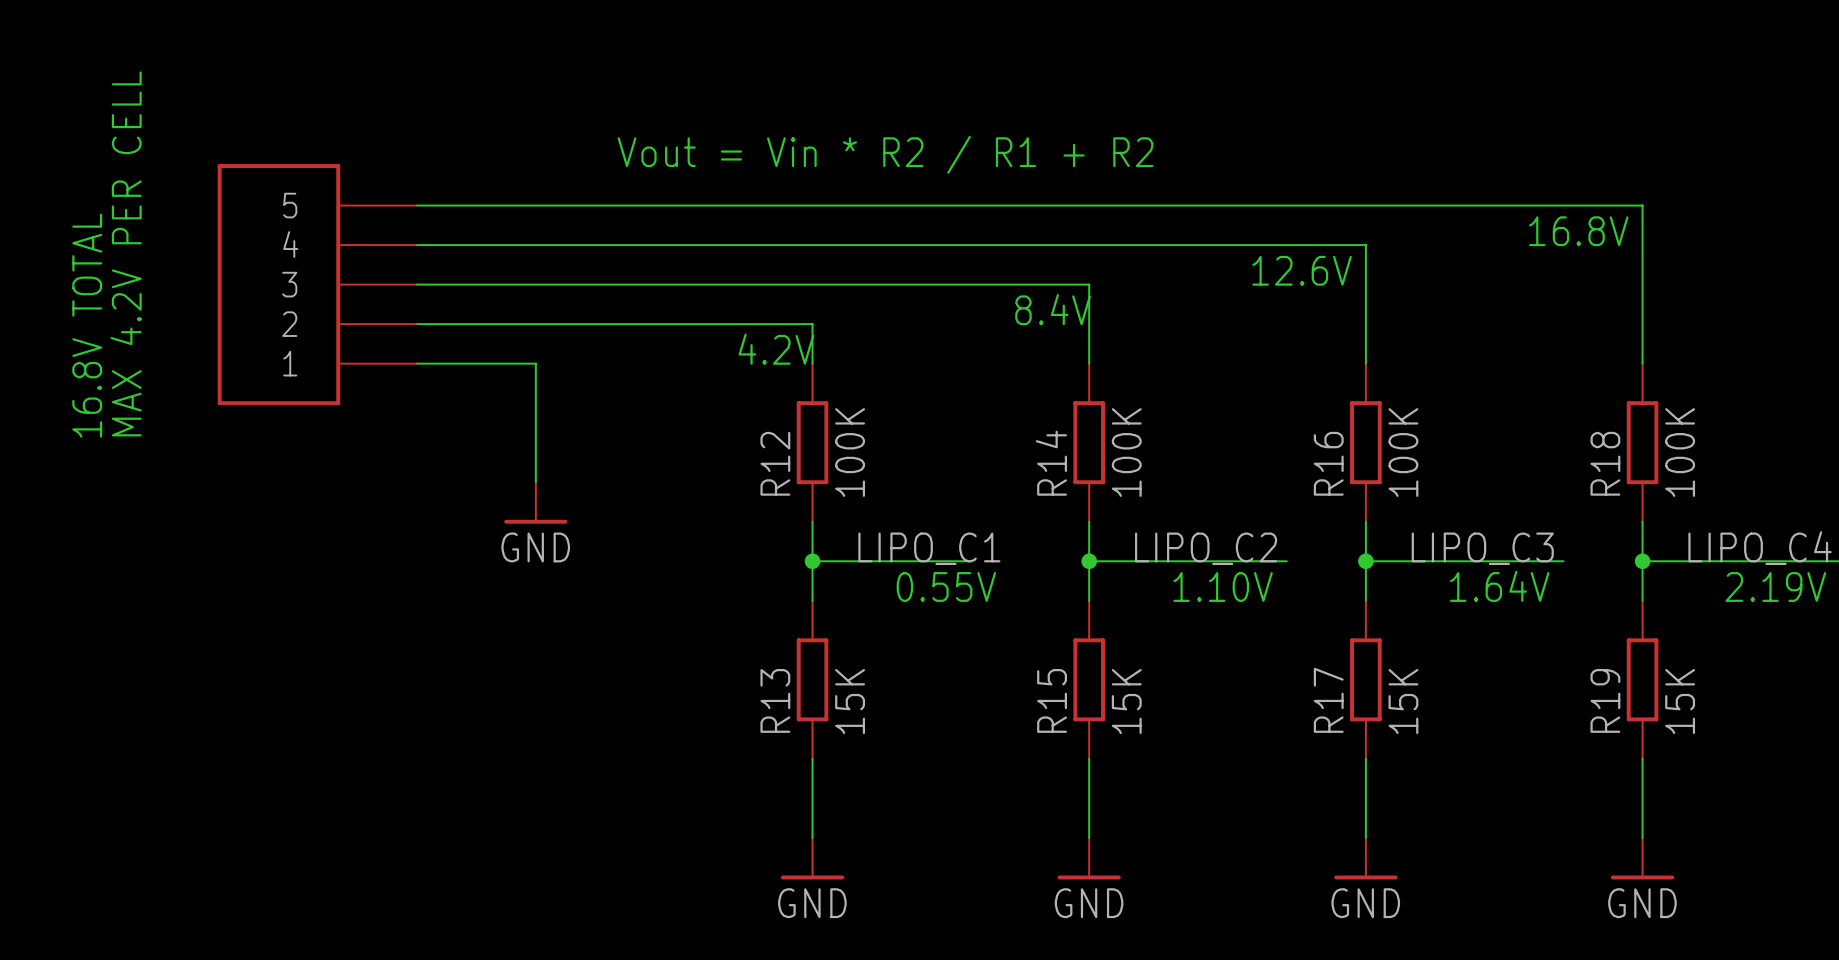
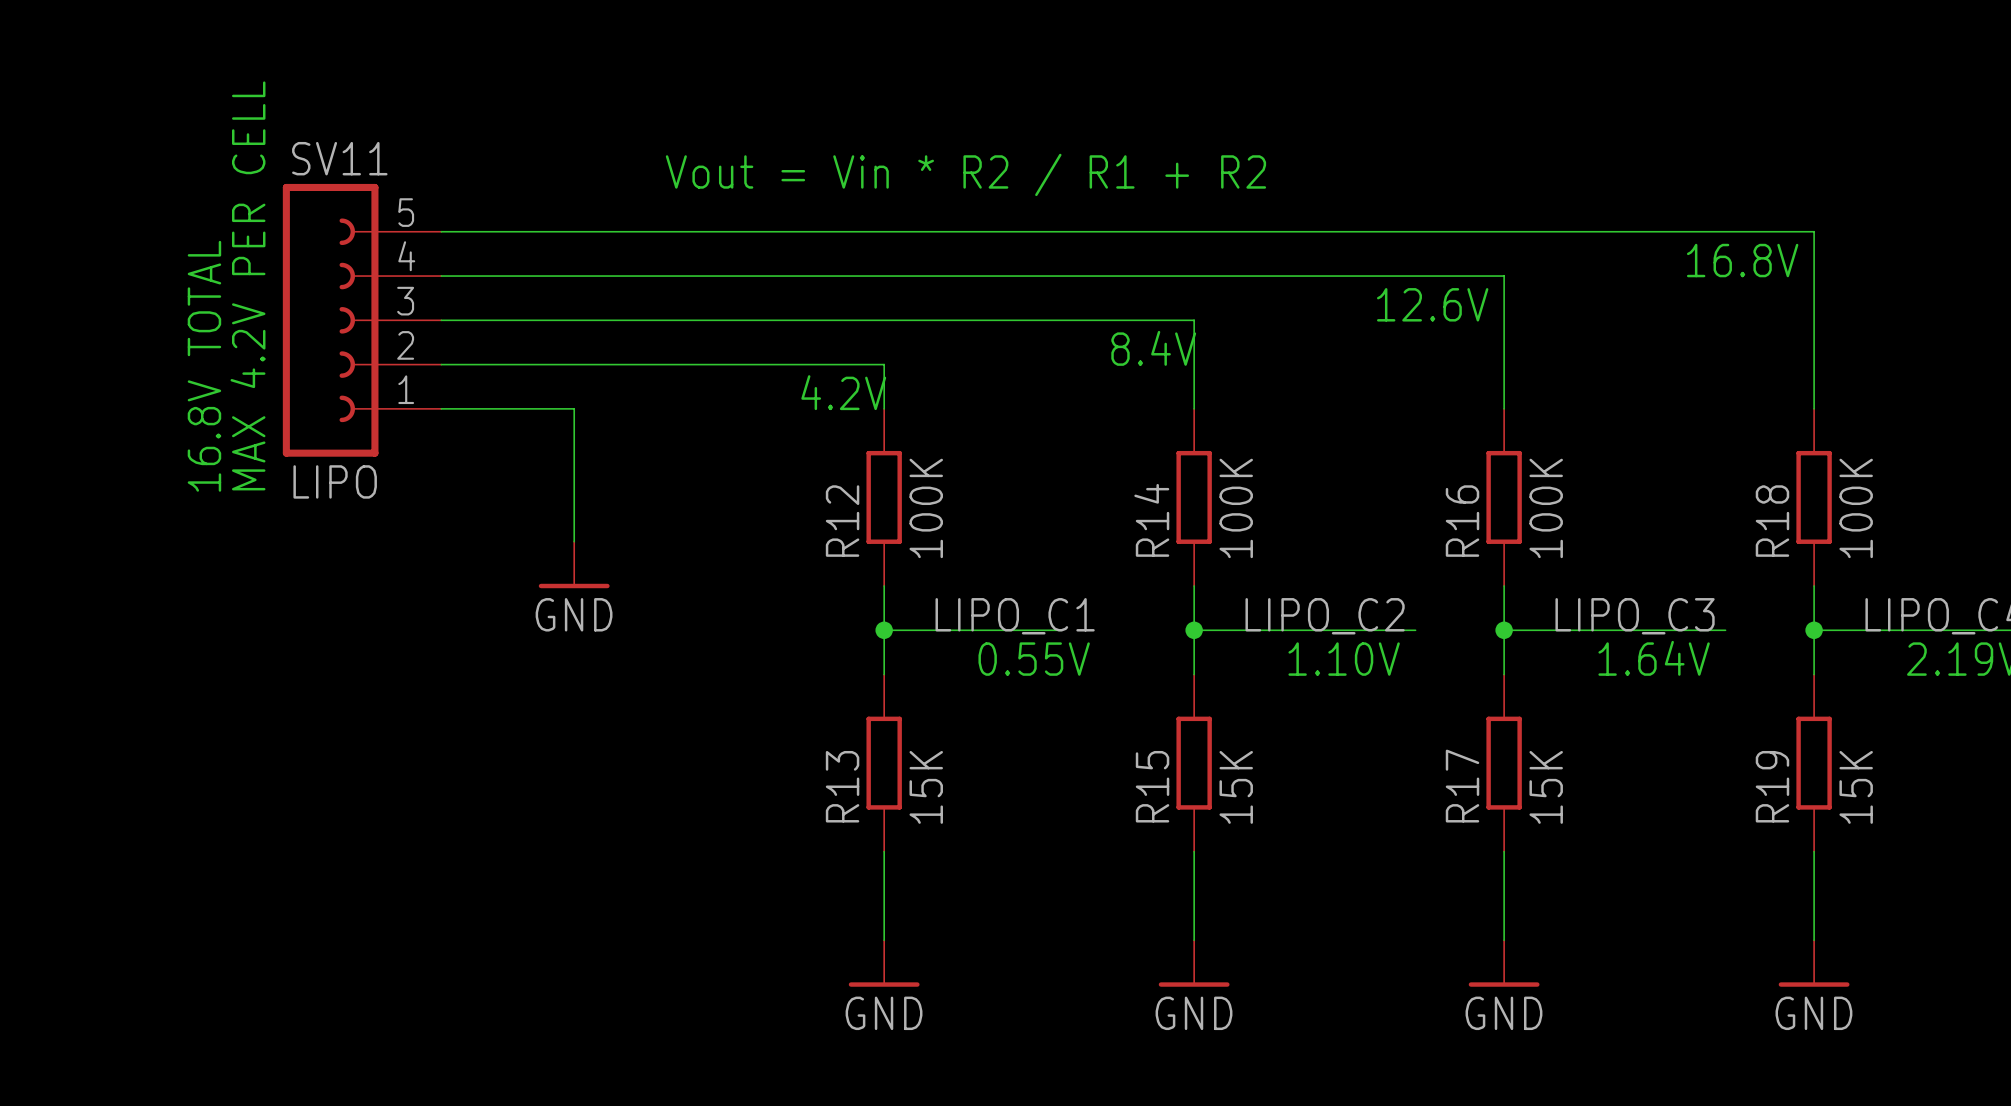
text position: MAX 4.2V PER CELL (126, 253) -> MAX 4.2V PER CELL (247, 285)
part: (317, 284) -> none
SV11: none -> LIPO (362, 320)
text position: 16.8V TOTAL (87, 325) -> 16.8V TOTAL (204, 366)

